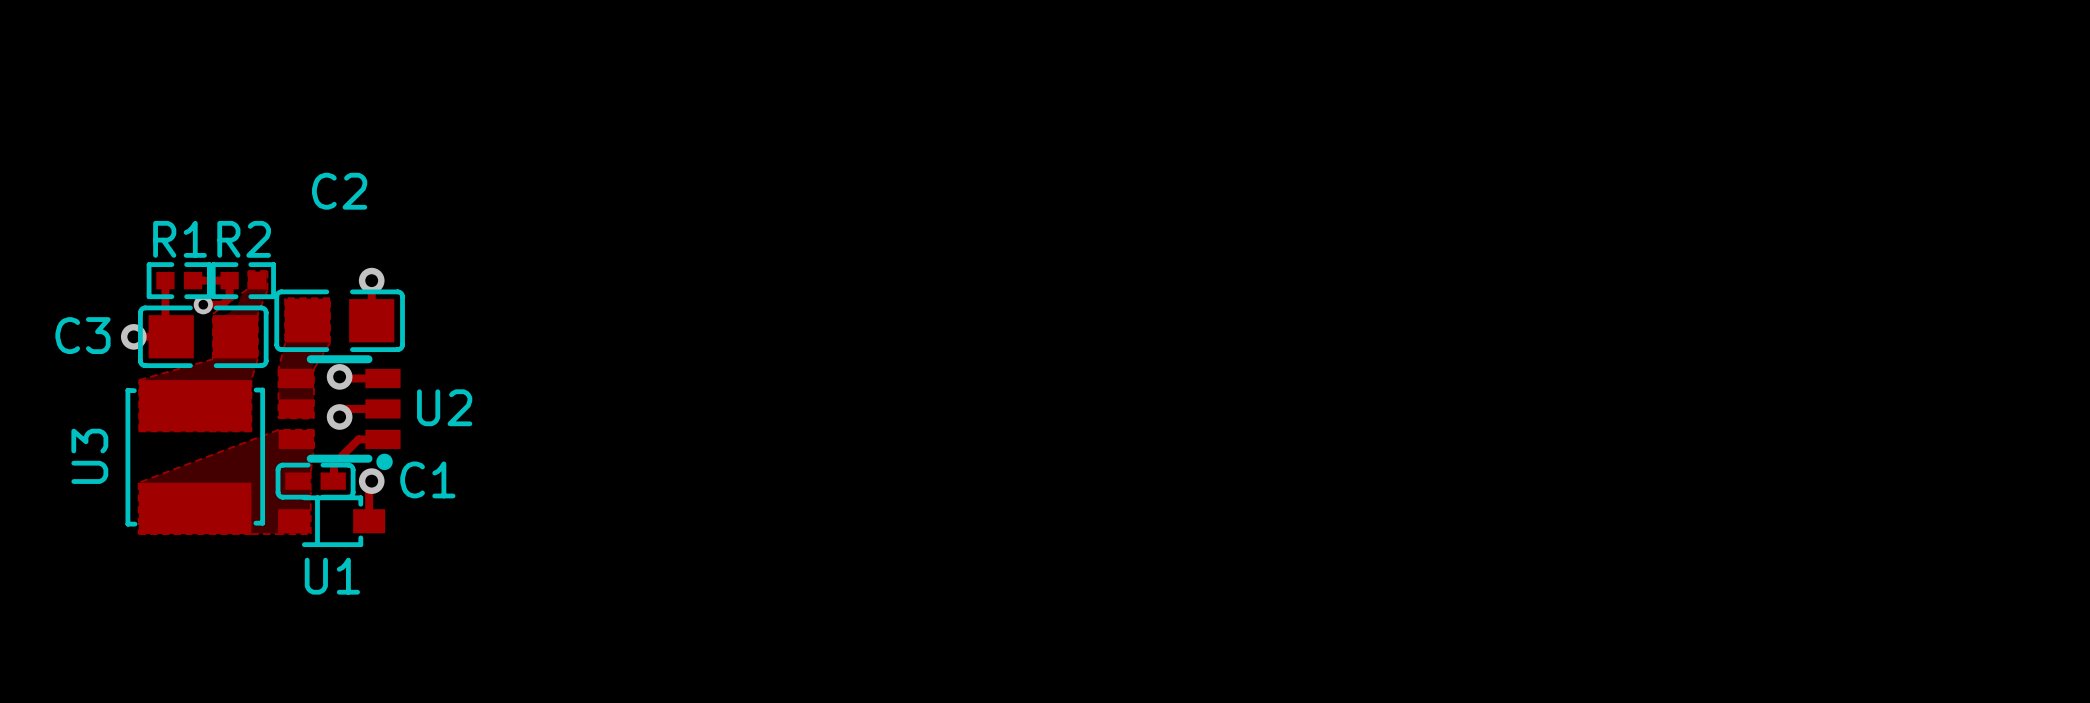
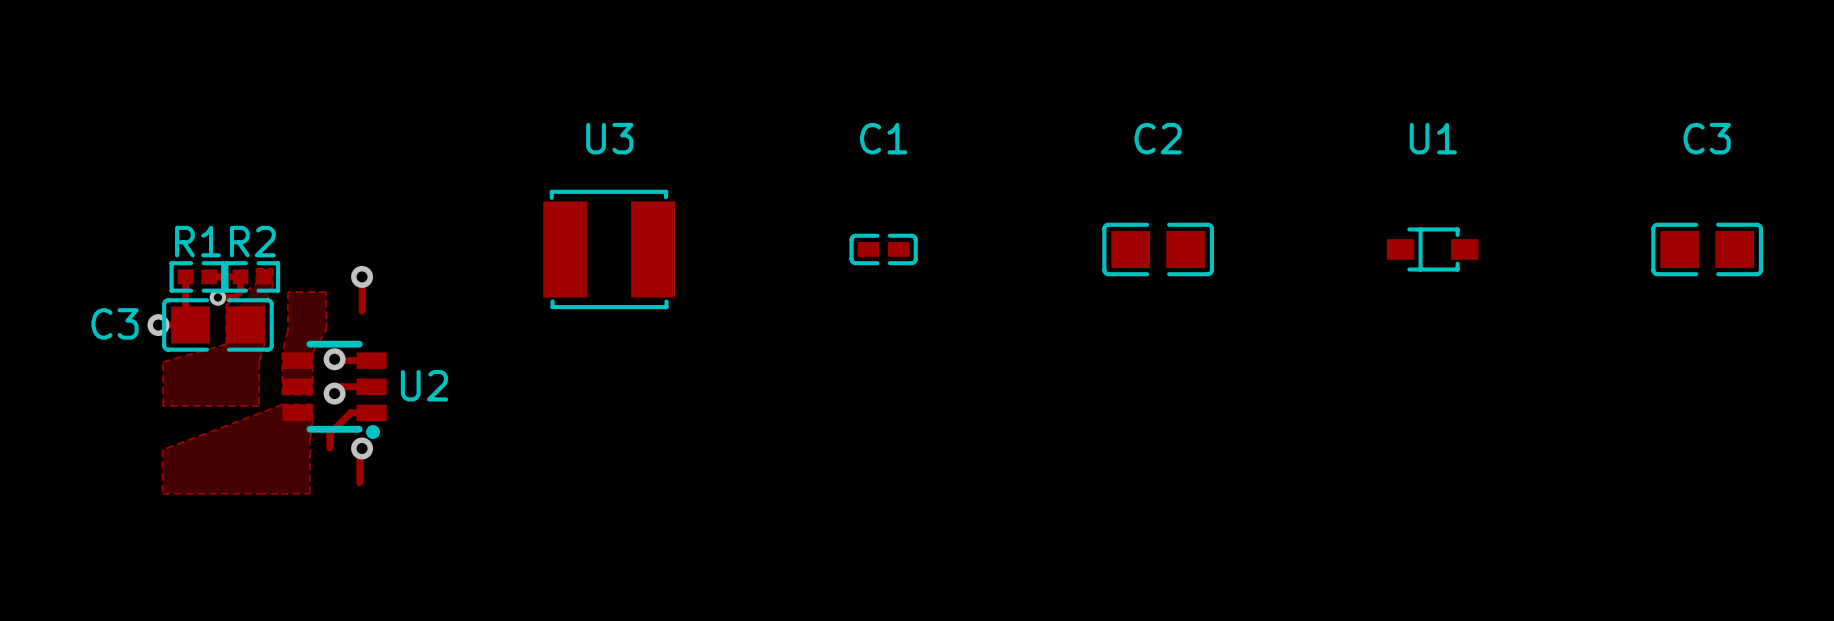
C3: none -> (1707, 249)
C2 footprint: [274, 289, 405, 353] -> [1102, 222, 1215, 277]
U3 rotation: 0° (195, 457) -> 90° clockwise (609, 249)
U3 position: (195, 457) -> (609, 249)
C1 name position: C1 (427, 479) -> C1 (883, 138)
C1 position: (315, 481) -> (883, 249)
U1 position: (331, 521) -> (1432, 249)
U1 name position: U1 (332, 576) -> U1 (1433, 138)

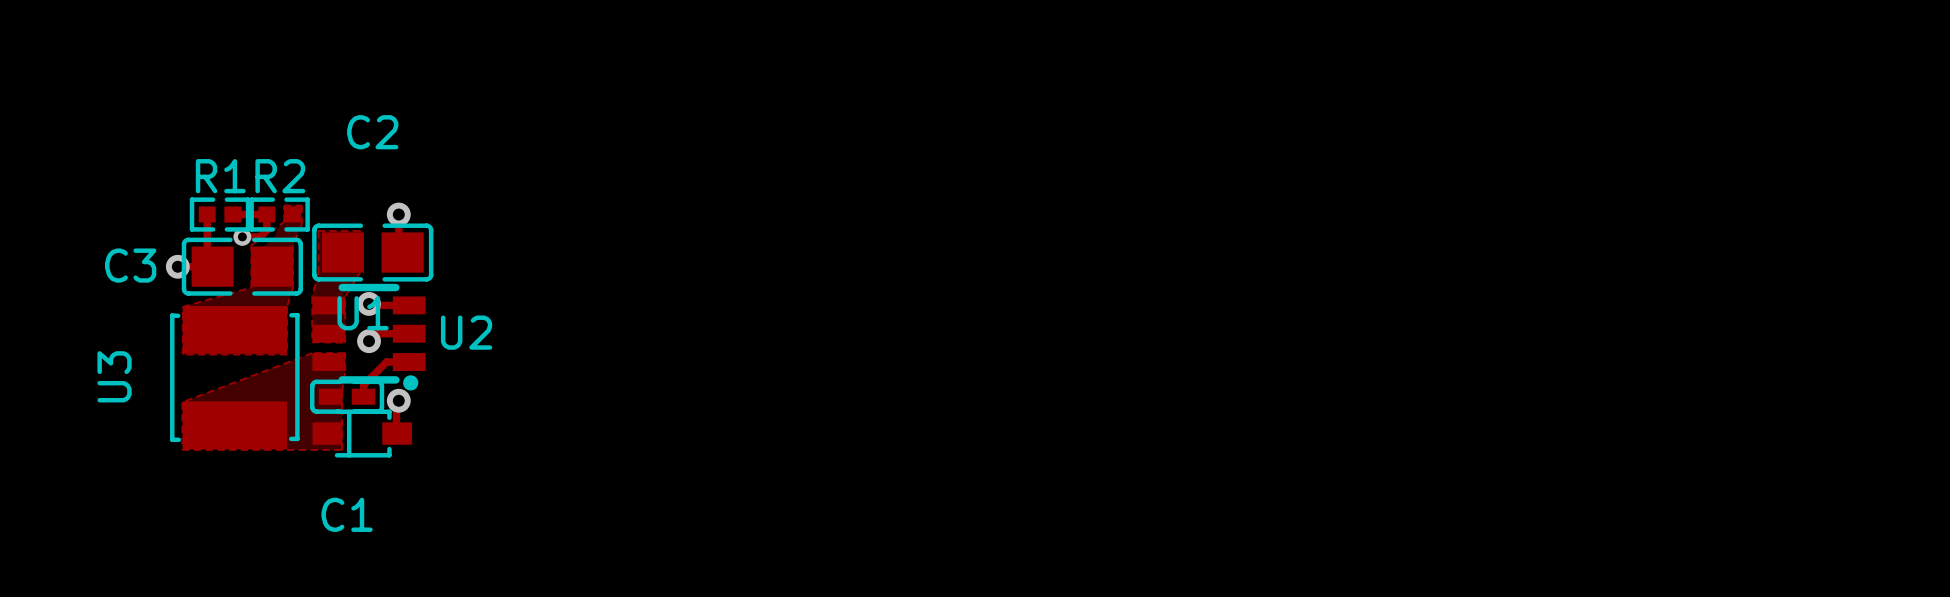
U3 name position: U3 (609, 138) -> U3 (114, 376)
C1 name position: C1 (883, 138) -> C1 (347, 514)
C2 footprint: [1102, 222, 1215, 277] -> [312, 223, 434, 282]
U3 rotation: 0° (609, 249) -> 90° clockwise (234, 377)
U3 position: (609, 249) -> (234, 377)
C1 position: (883, 249) -> (347, 396)
U1 position: (1432, 249) -> (362, 433)
C3: (1707, 249) -> none

